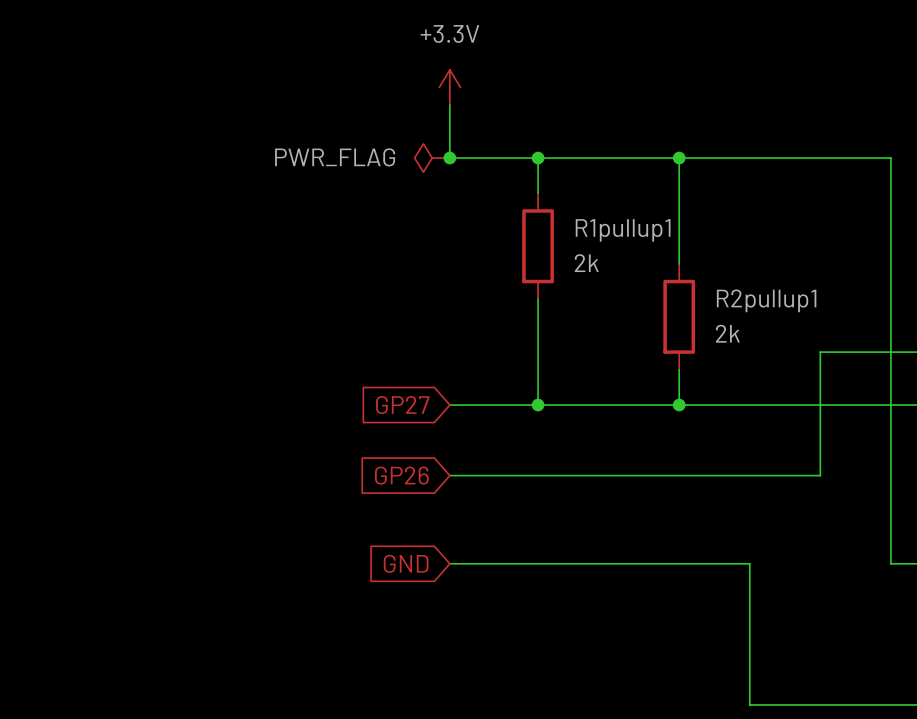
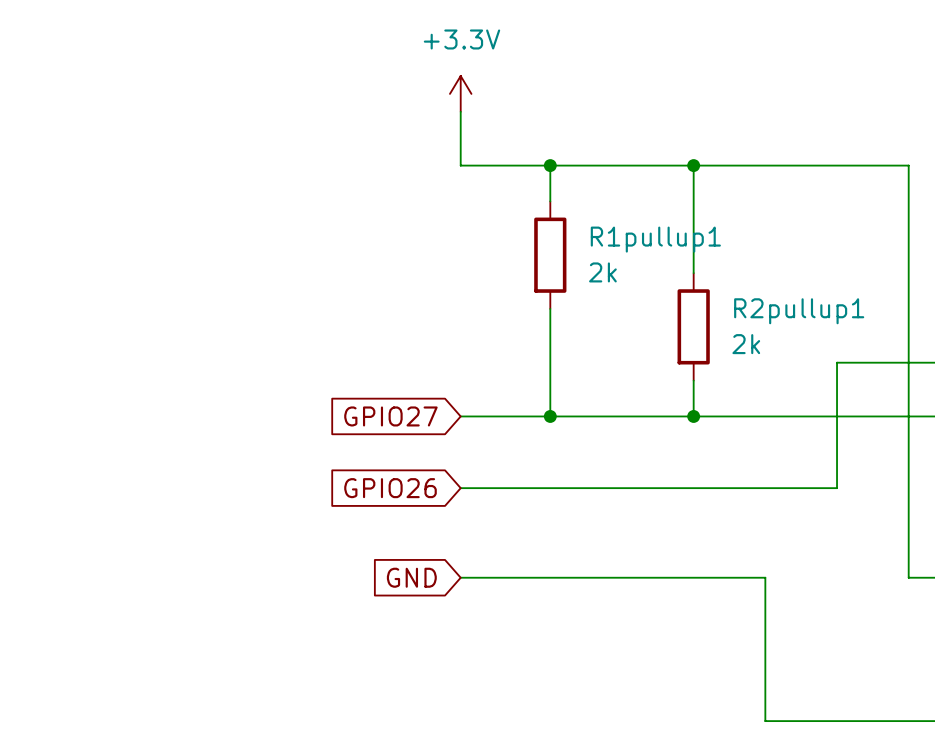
power symbol: PWR_FLAG (432, 158) -> none
junction: (449, 158) -> none
global label: GP27 (402, 405) -> GPIO27 (390, 416)
global label: GP26 (401, 475) -> GPIO26 (390, 488)

